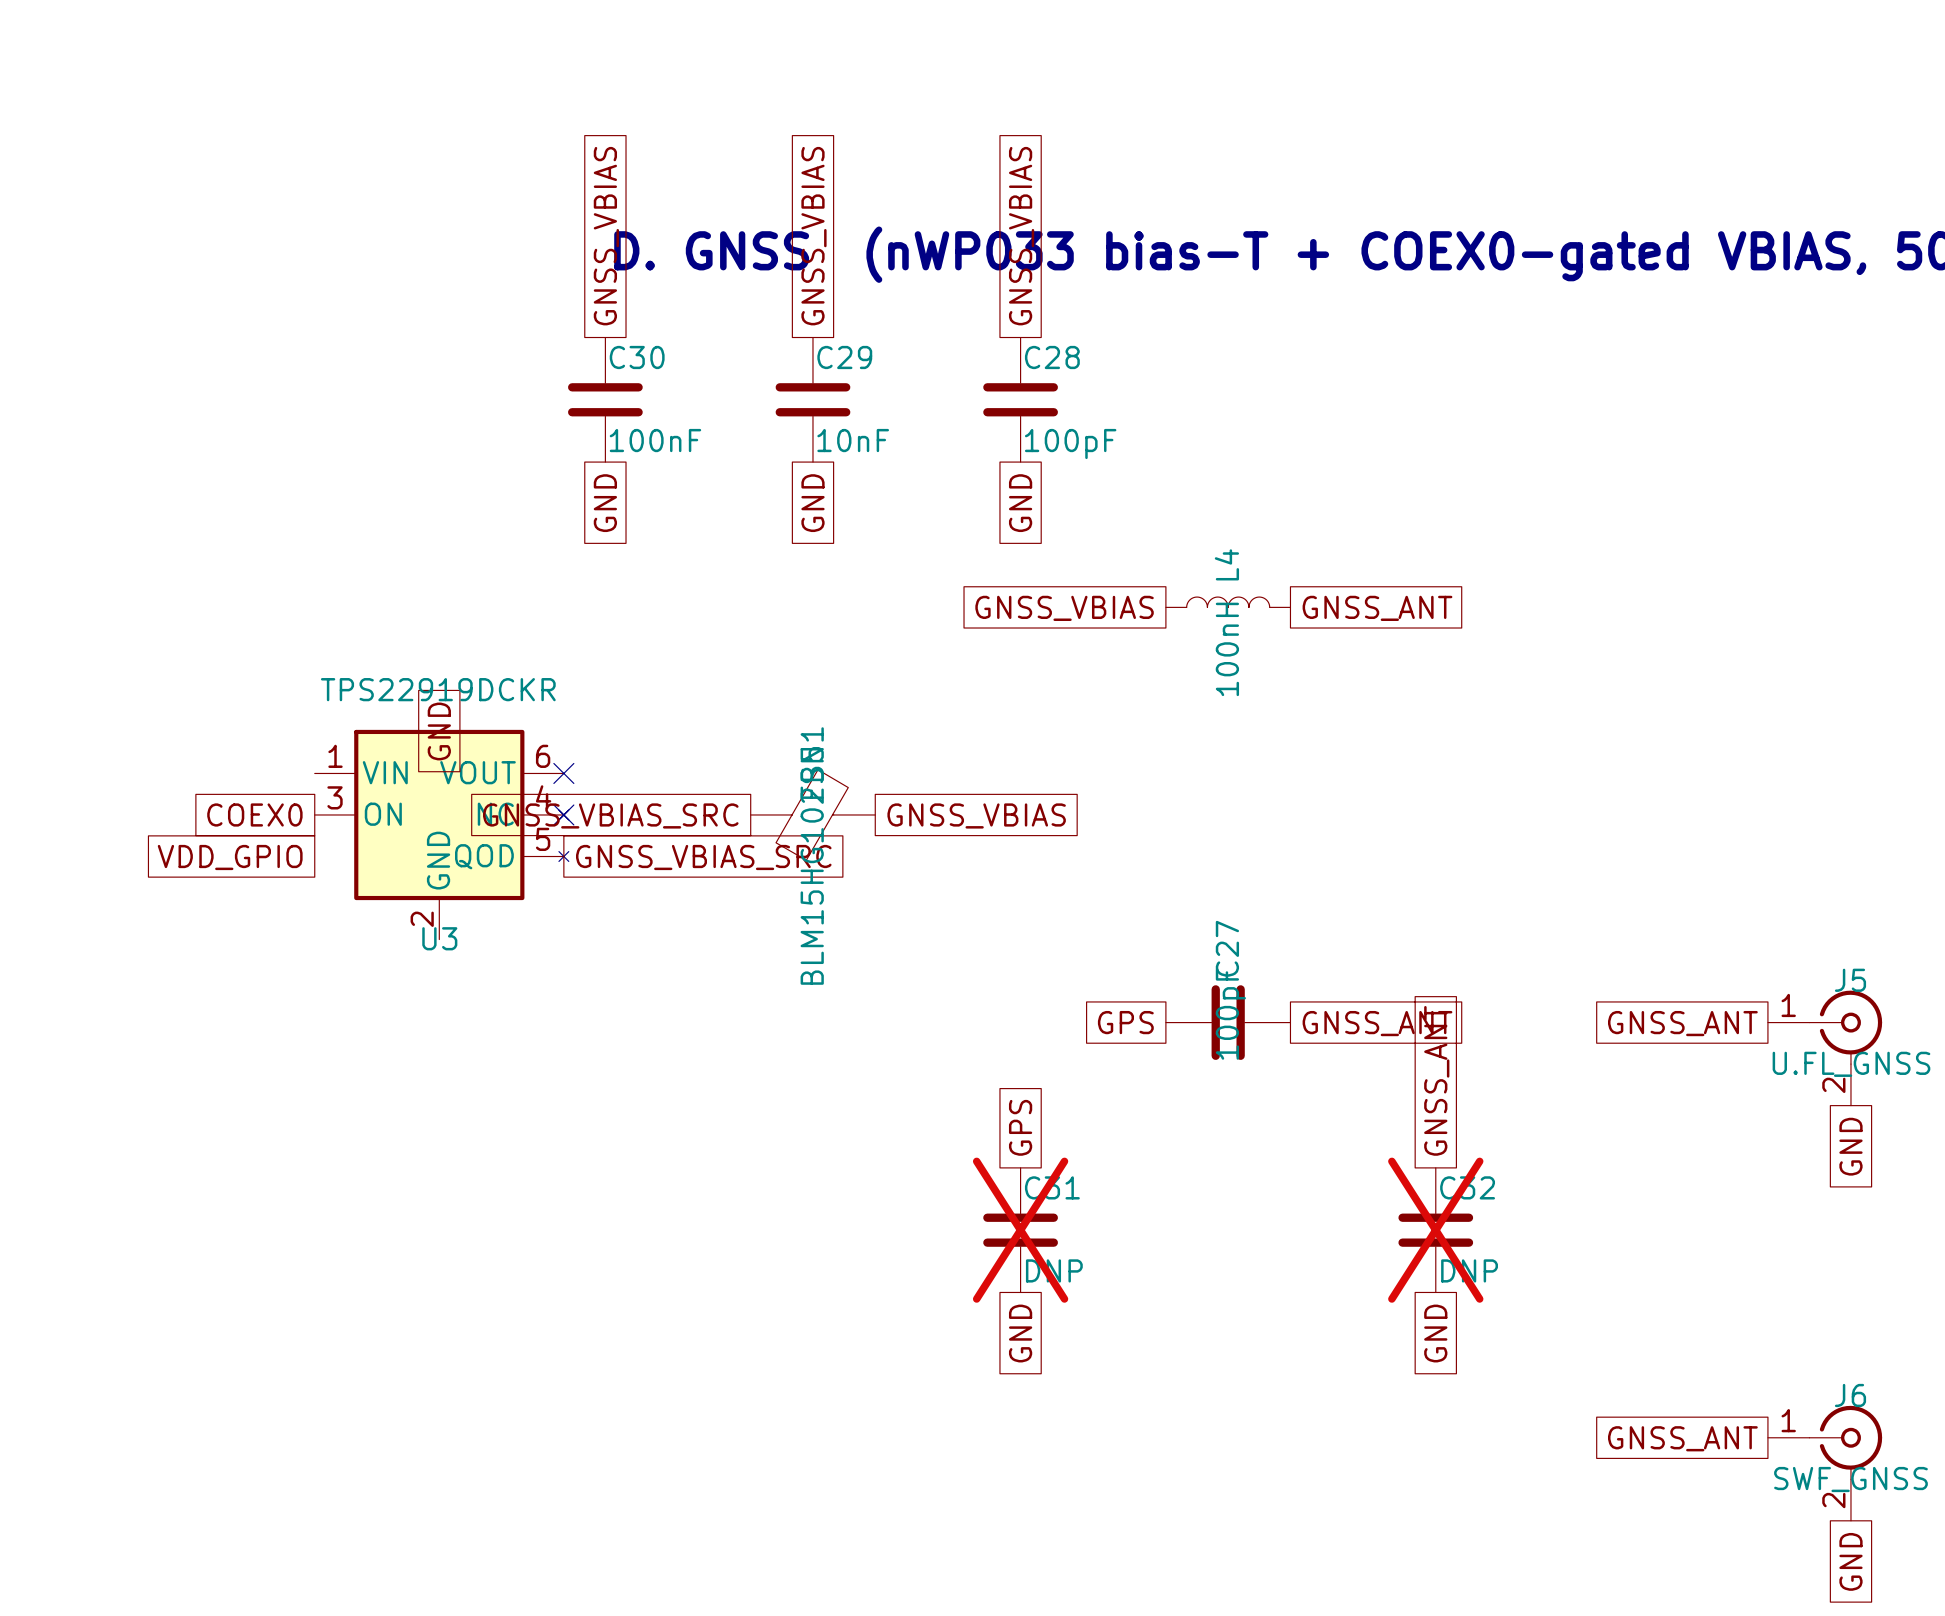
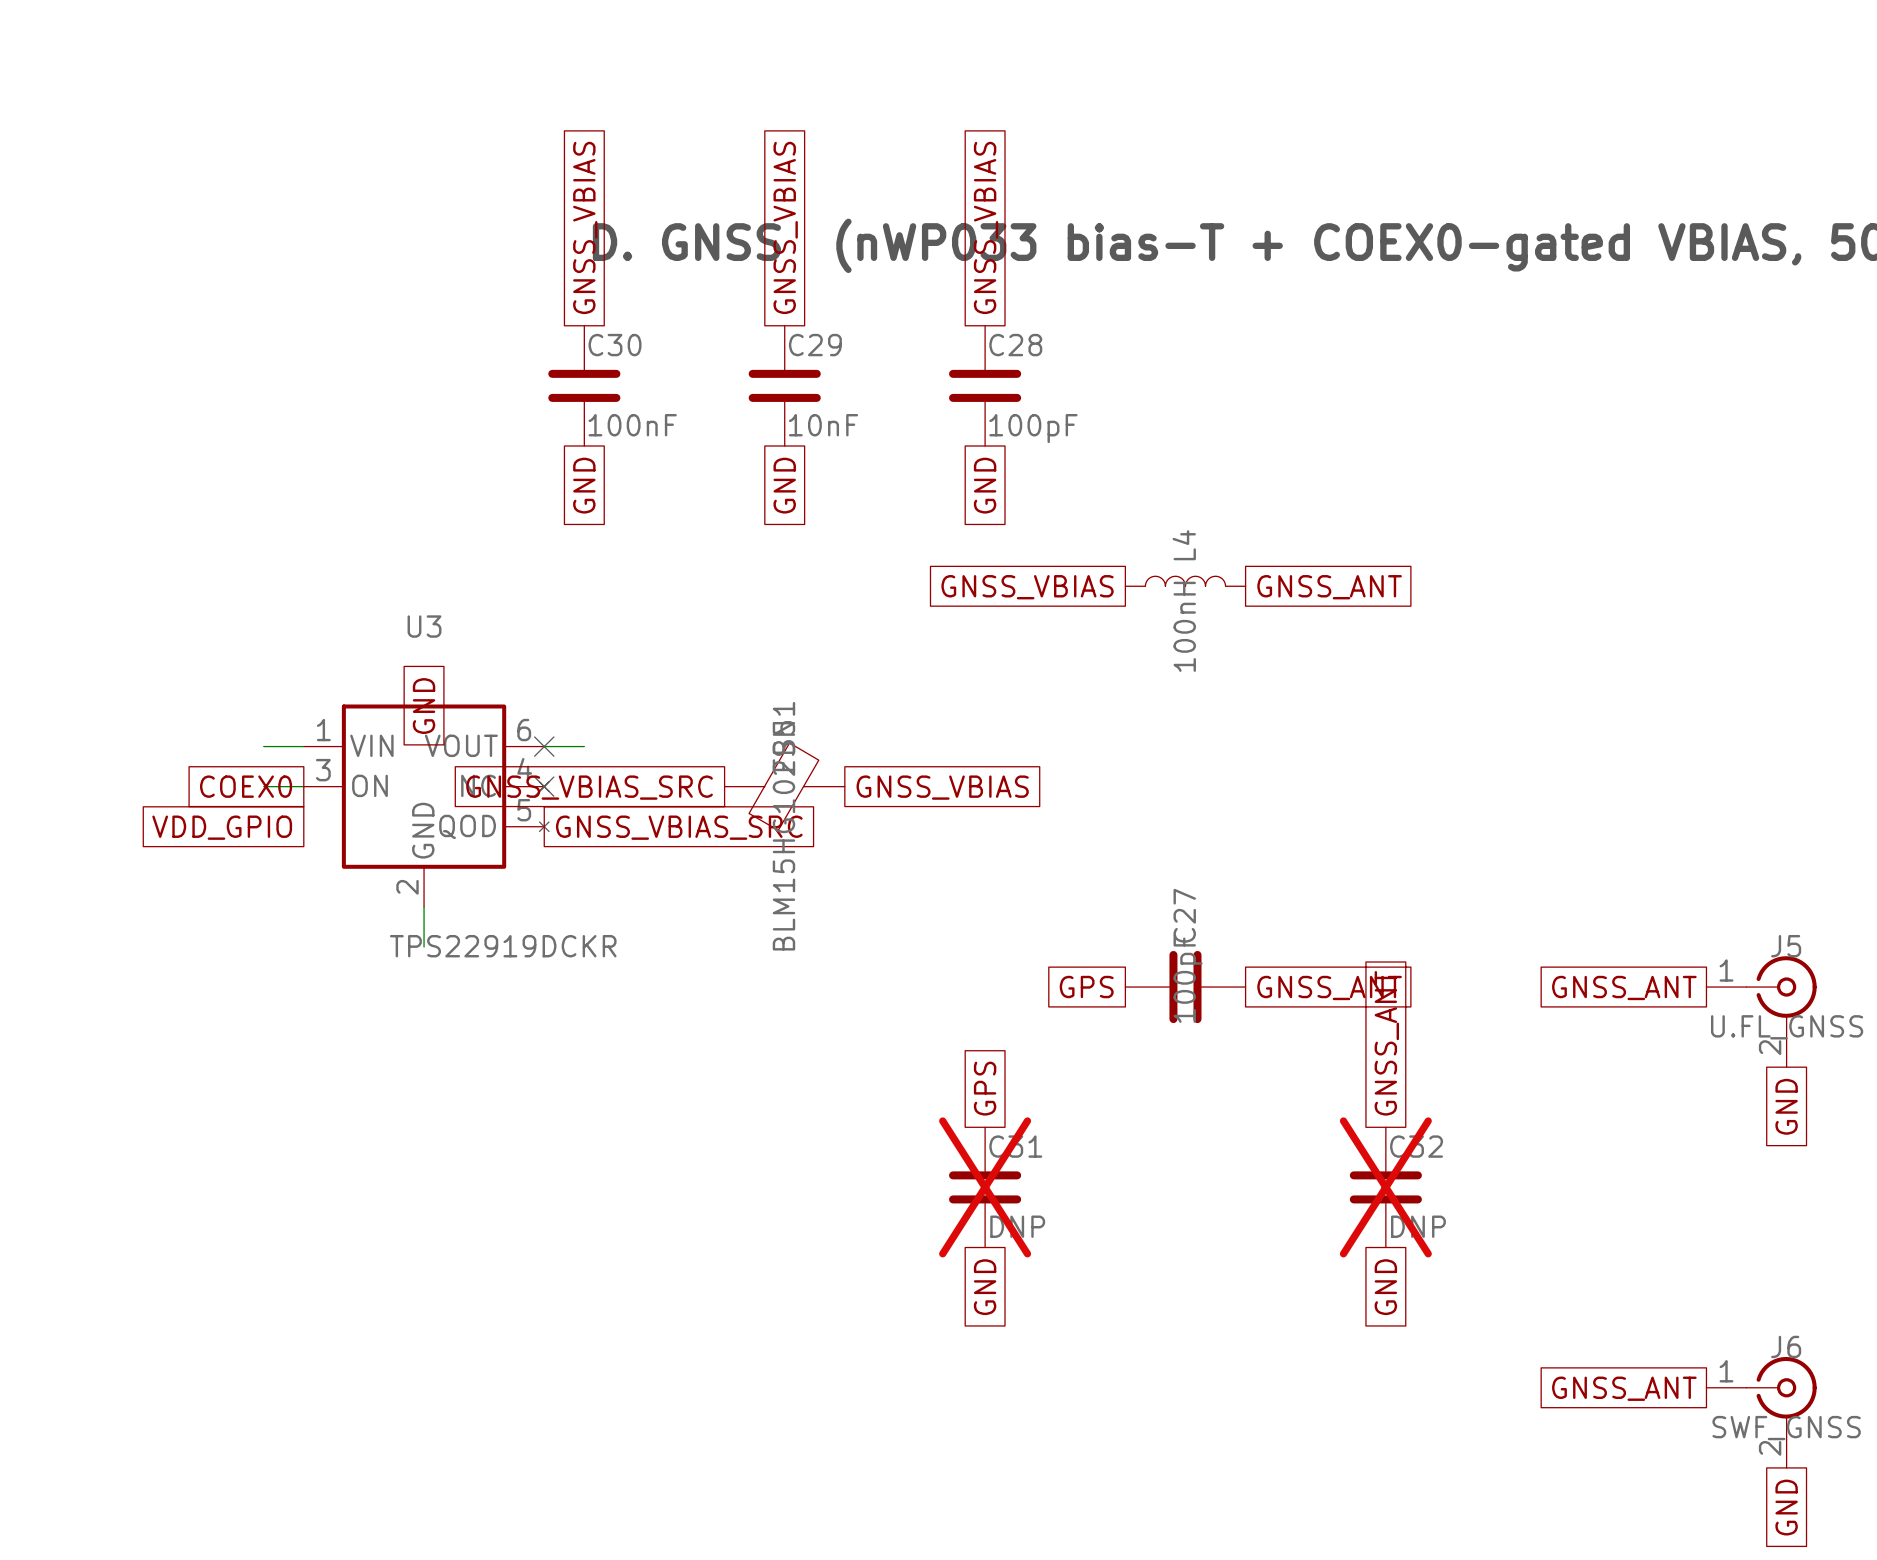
U3 value position: TPS22919DCKR (438, 689) -> TPS22919DCKR (503, 946)
wire: none -> (263, 746) (303, 746)
wire: none -> (544, 746) (584, 746)
wire: none -> (263, 786) (303, 786)
U3 name position: U3 (439, 938) -> U3 (424, 626)
wire: none -> (424, 906) (424, 946)

